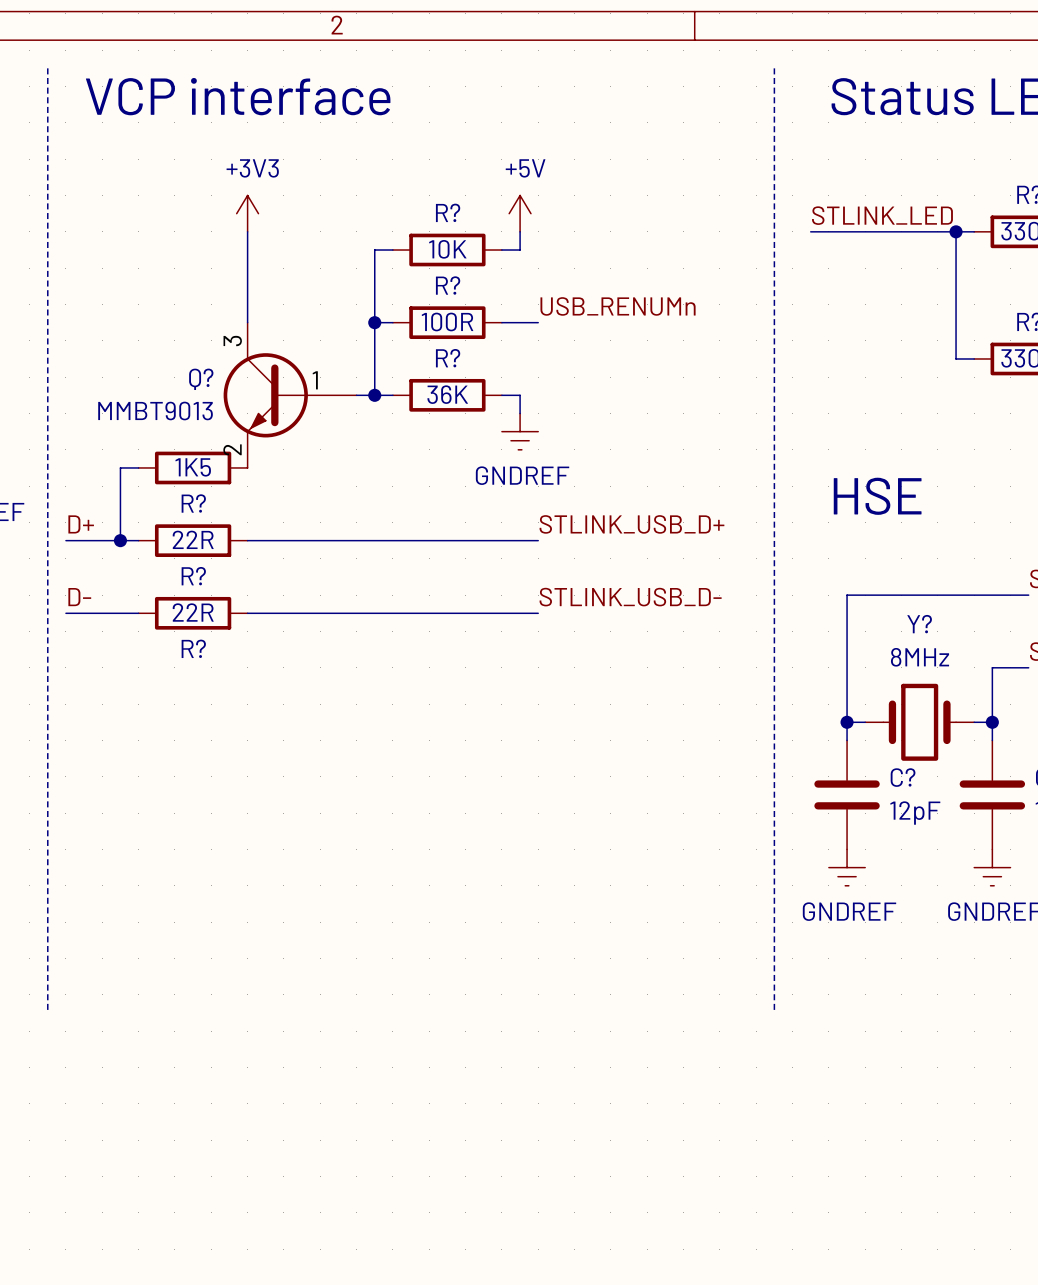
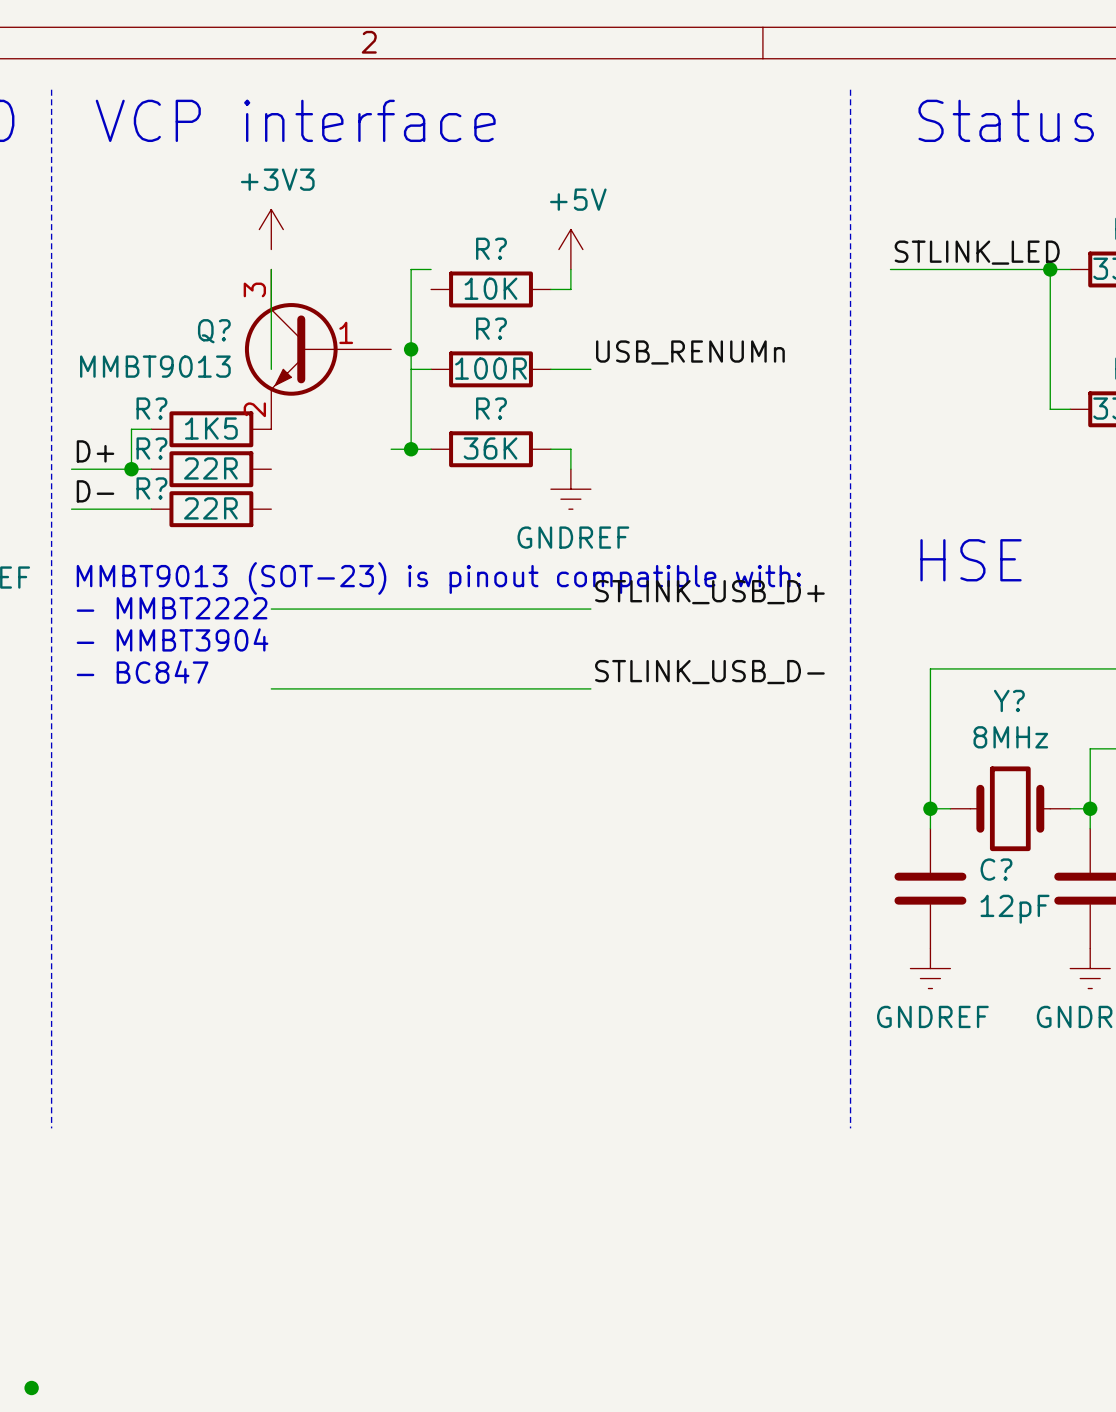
power symbol position: +3V3 (247, 213) -> +3V3 (271, 229)
wire: (374, 250) (392, 250) -> (411, 289) (411, 269) (431, 269)
junction position: (374, 322) -> (411, 349)
wire: none -> (151, 429) (131, 429) (131, 469)
Q? position: (290, 395) -> (318, 349)
junction: none -> (131, 469)
R?: none -> 22R (211, 469)
label: none -> D- (95, 491)
R?: none -> 22R (211, 509)
wire: (138, 467) (120, 467) (120, 540) -> none
R? position: (193, 467) -> (211, 429)
R? name position: R? (193, 503) -> R? (151, 408)
text: none -> MMBT9013 (SOT-23) is pinout compatible with: (438, 578)
label position: D+ (81, 524) -> D+ (95, 451)
text: none -> - MMBT2222 (172, 608)
wire: (65, 540) (138, 540) -> (71, 509) (151, 509)
junction: (120, 540) -> none
R?: 22R (193, 540) -> none
text: none -> - MMBT3904 (172, 639)
label: D- (79, 597) -> none
text: none -> - BC847 (142, 672)
wire: (65, 613) (138, 613) -> (71, 469) (151, 469)
R?: 22R (193, 613) -> none
junction: none -> (31, 1388)

